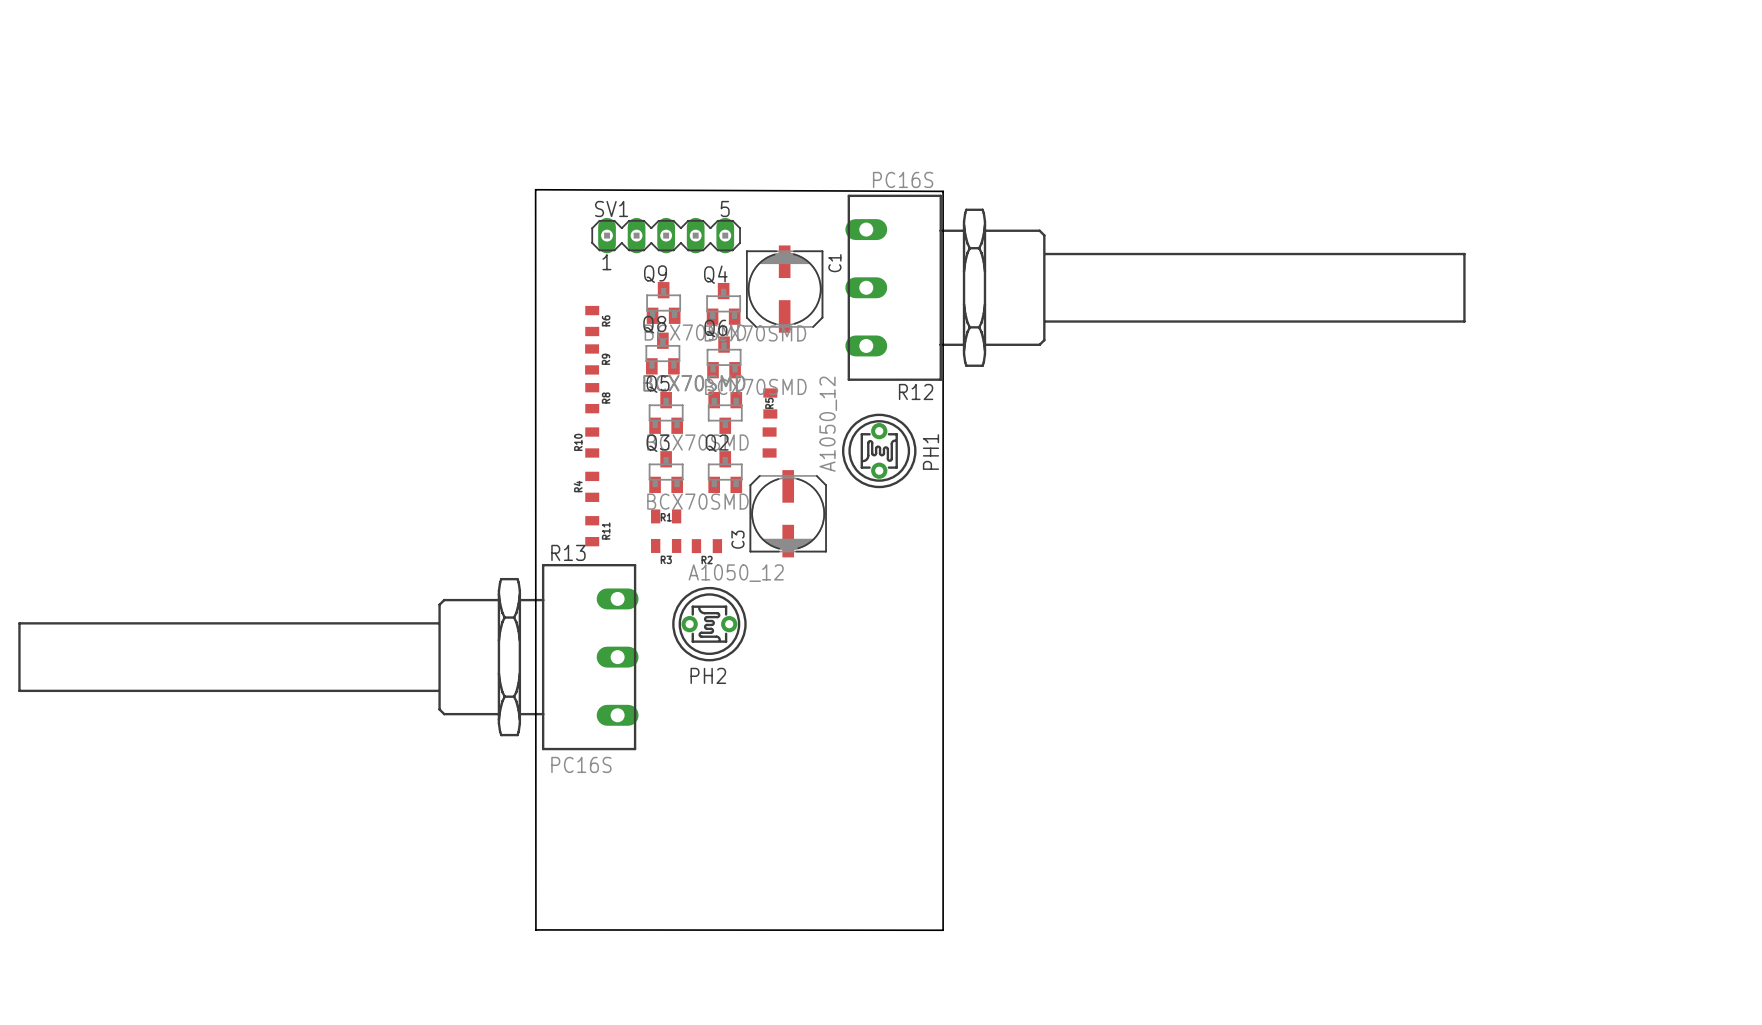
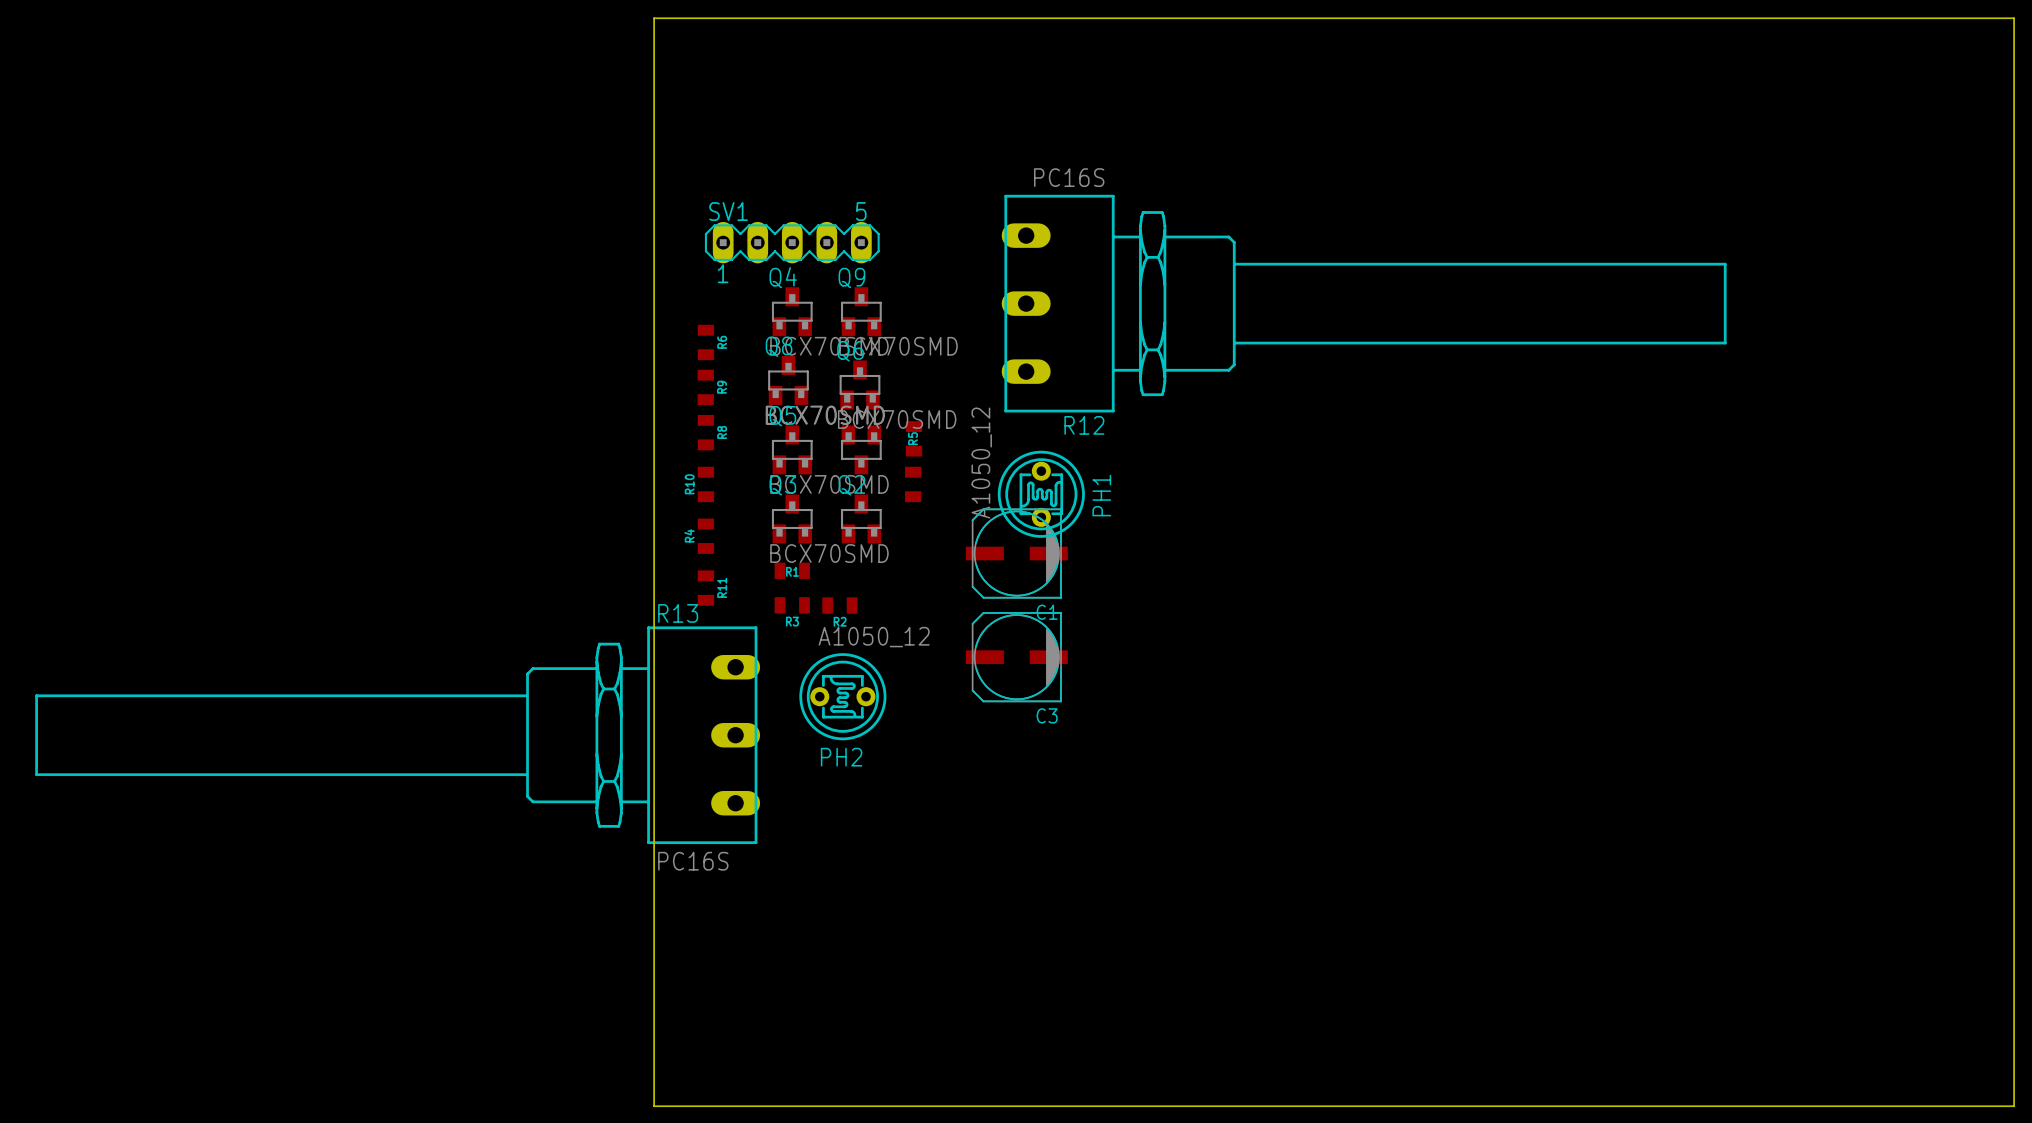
board edge: none -> (654, 18) (2014, 18) (2014, 1106) (654, 1106) (654, 18)
board edge: (535, 189) (943, 191) (943, 930) (535, 929) (535, 189) -> none
C1 rotation: 0° (784, 289) -> 90° clockwise (1016, 553)
C1 position: (784, 289) -> (1016, 553)
Q9 position: (663, 302) -> (861, 311)
Q4 position: (723, 303) -> (792, 311)
C3 rotation: 0° (788, 513) -> 90° counterclockwise (1016, 657)
C3 position: (788, 513) -> (1016, 657)

